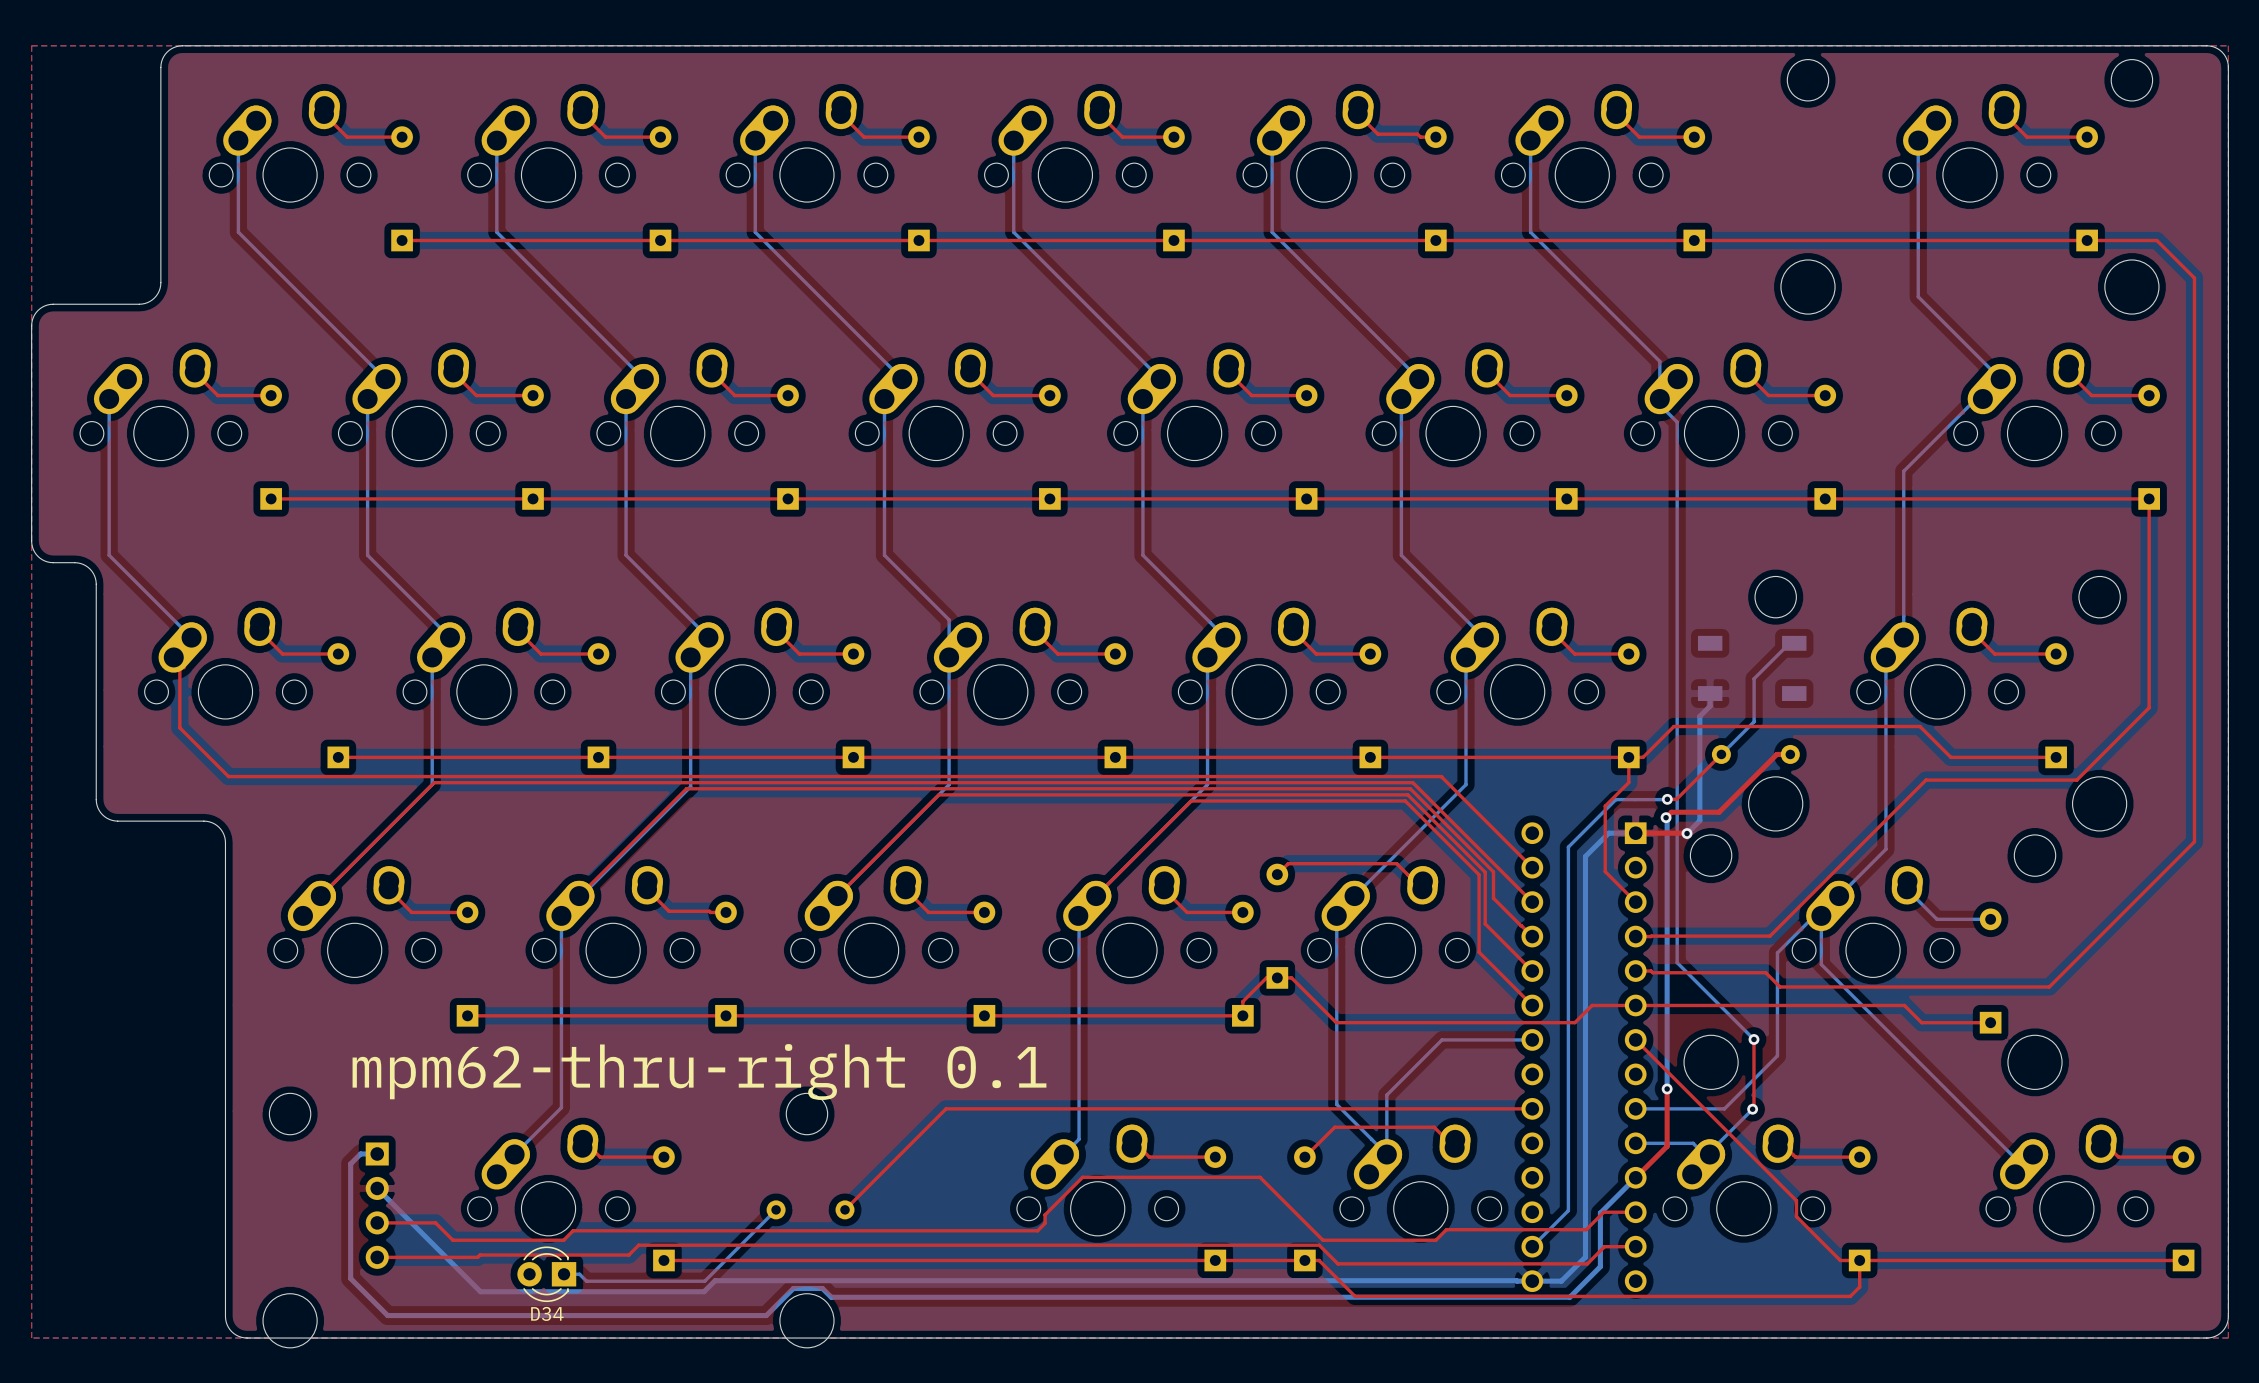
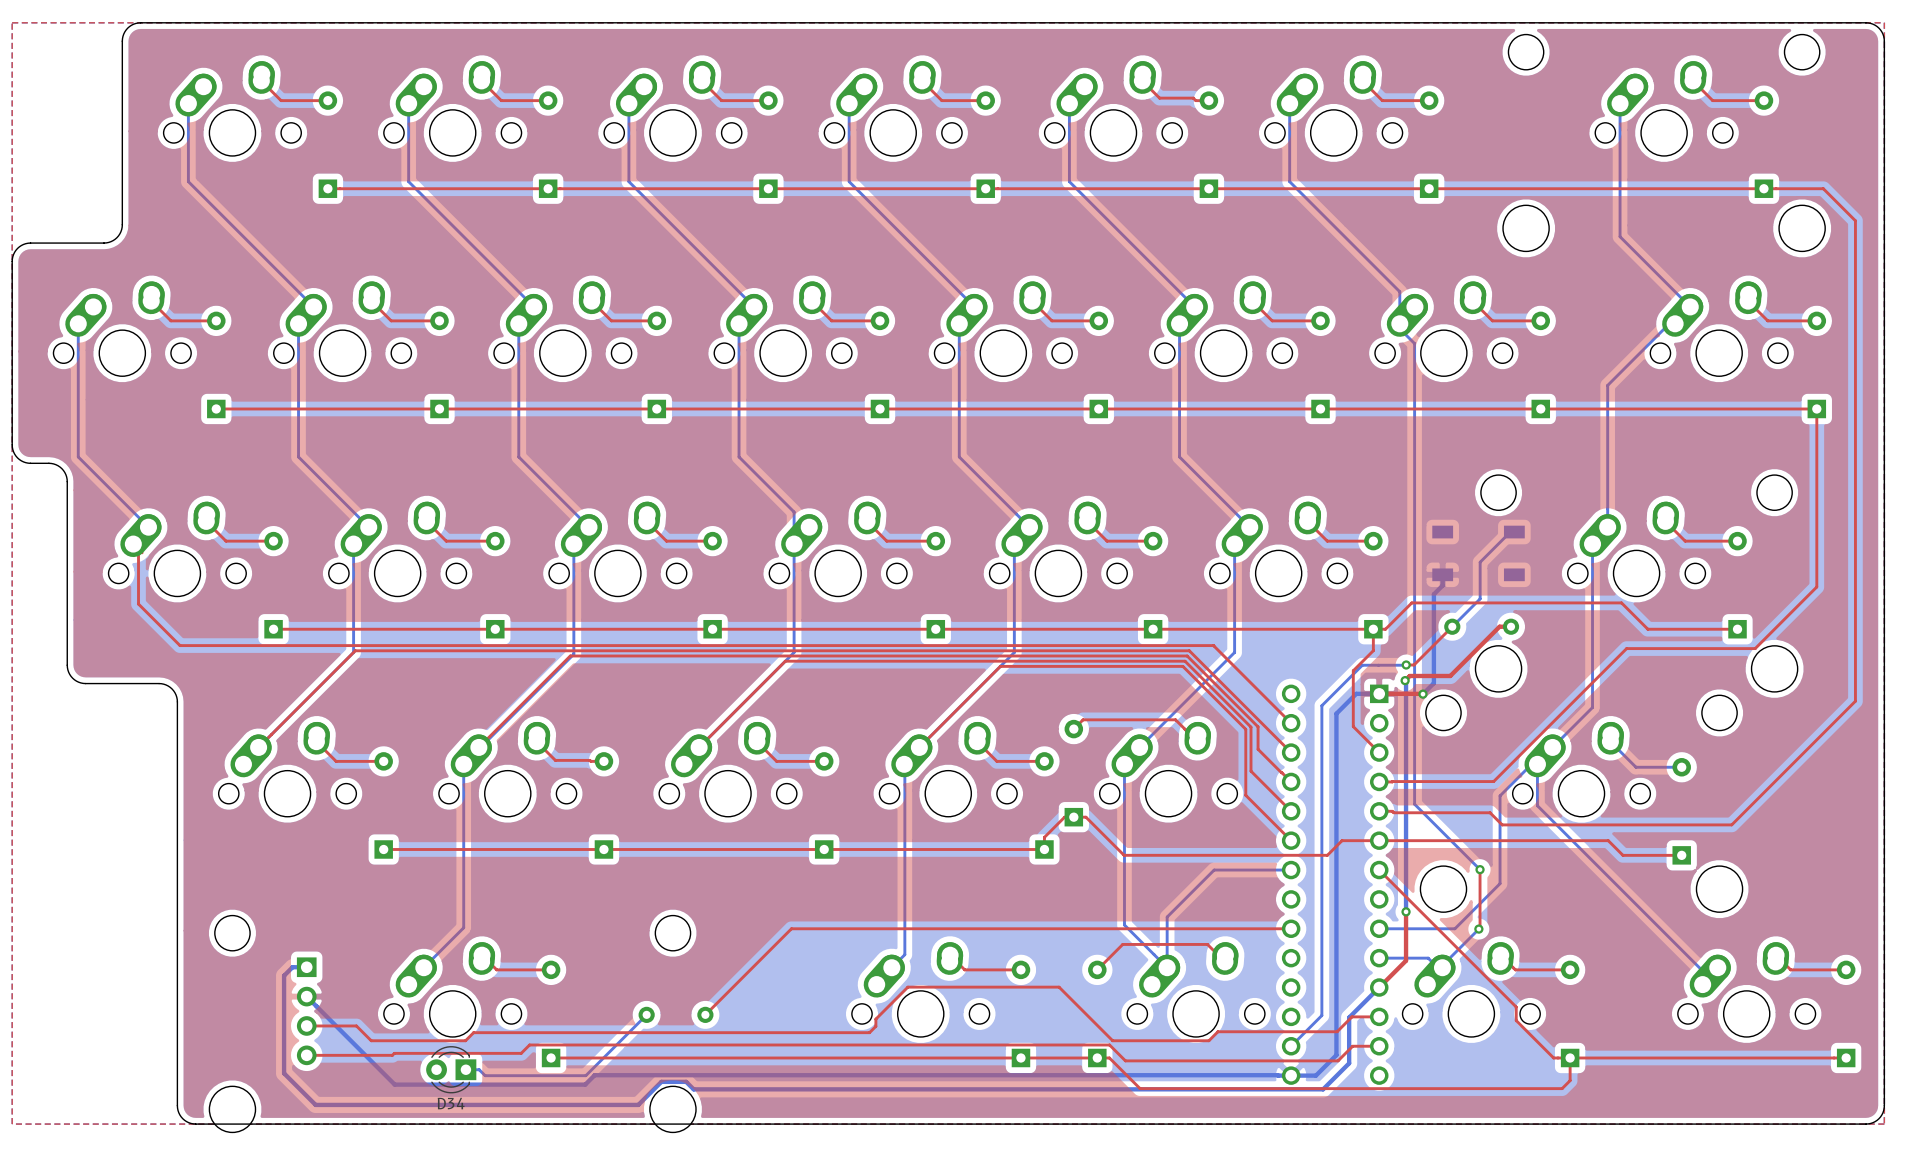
text: mpm62-thru-right 0.1 (699, 1072) -> none

